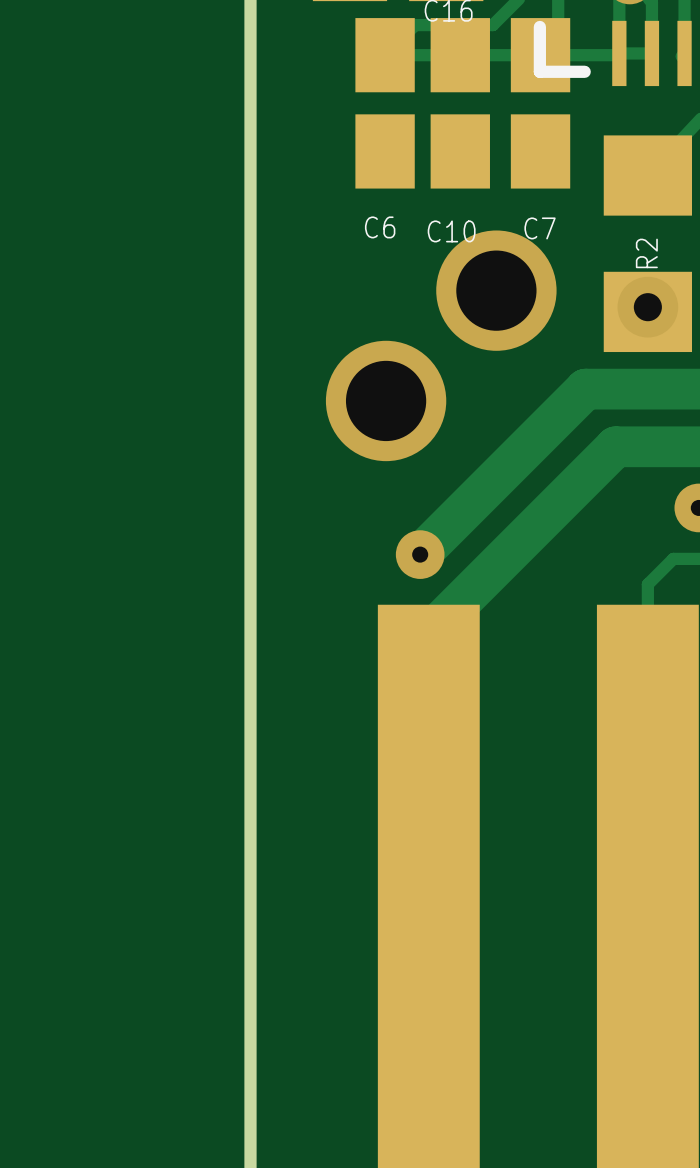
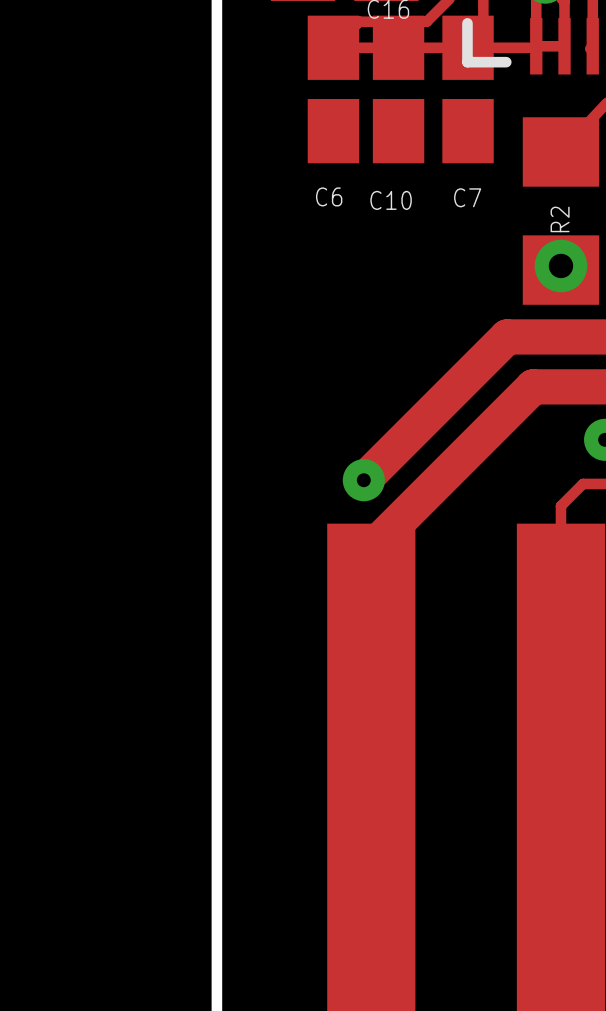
via: (496, 290) -> none
via: (386, 400) -> none

